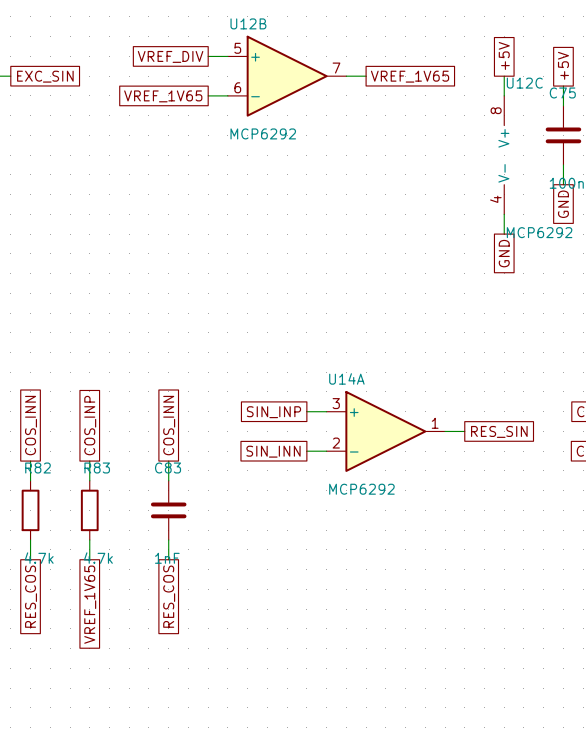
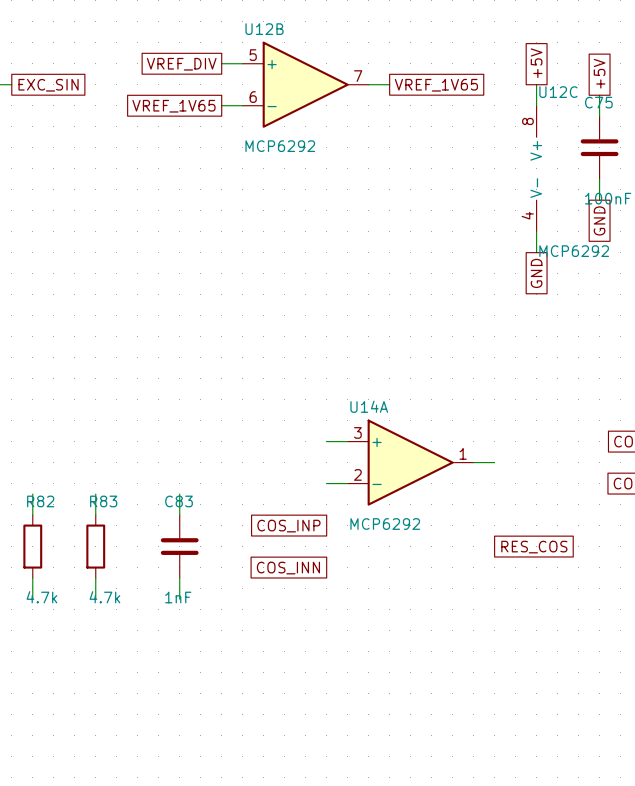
global label: SIN_INP (273, 412) -> none
global label: COS_INN (31, 425) -> none
global label: COS_INP (90, 425) -> none
global label: COS_INN (169, 425) -> none
global label: RES_SIN (499, 431) -> none
global label: SIN_INN (273, 451) -> none
global label: none -> COS_INP (288, 526)
global label: none -> RES_COS (534, 547)
global label: none -> COS_INN (288, 568)
global label: RES_COS (31, 596) -> none
global label: RES_COS (169, 596) -> none
global label: VREF_1V65 (90, 604) -> none

